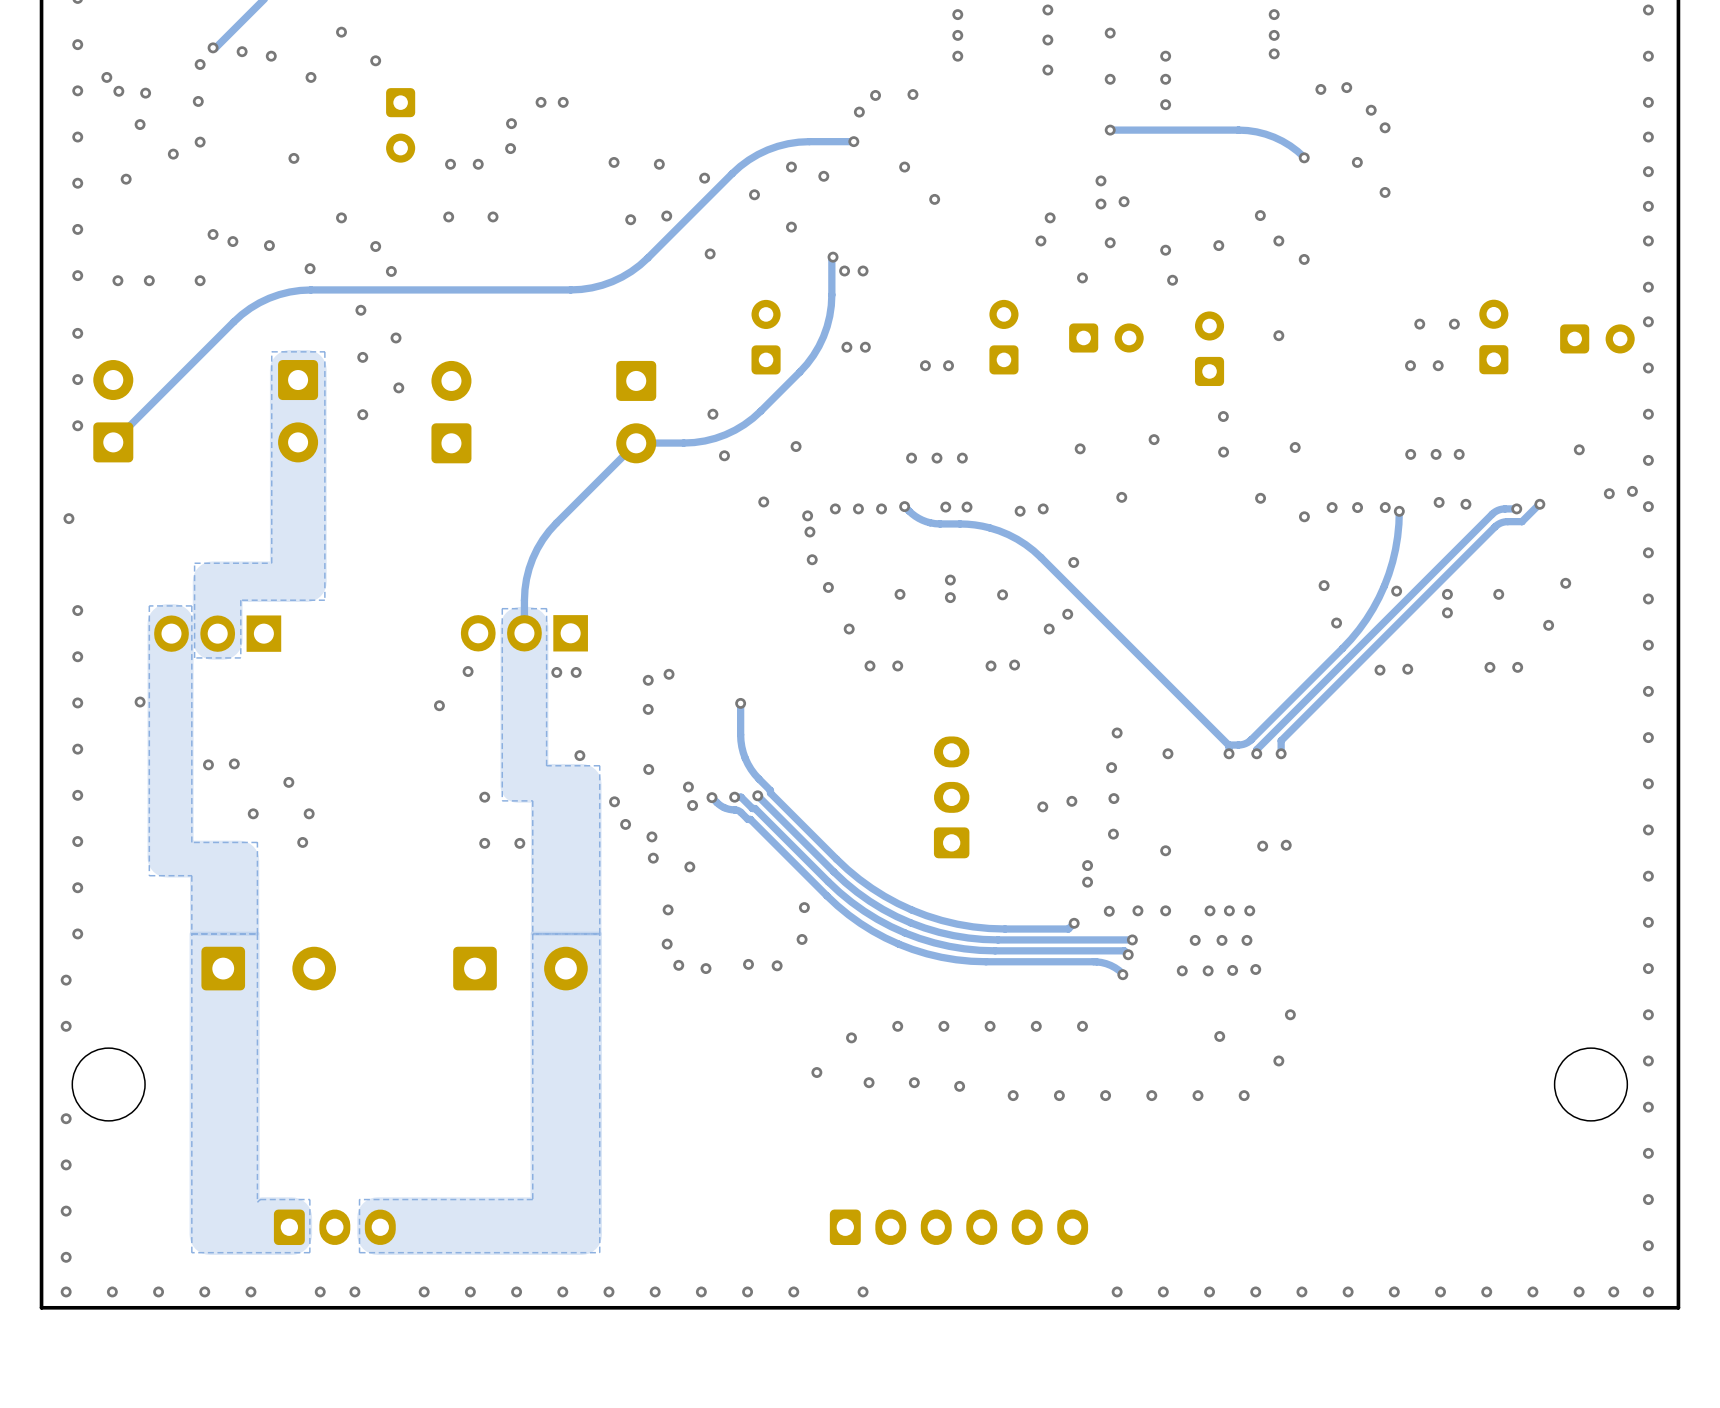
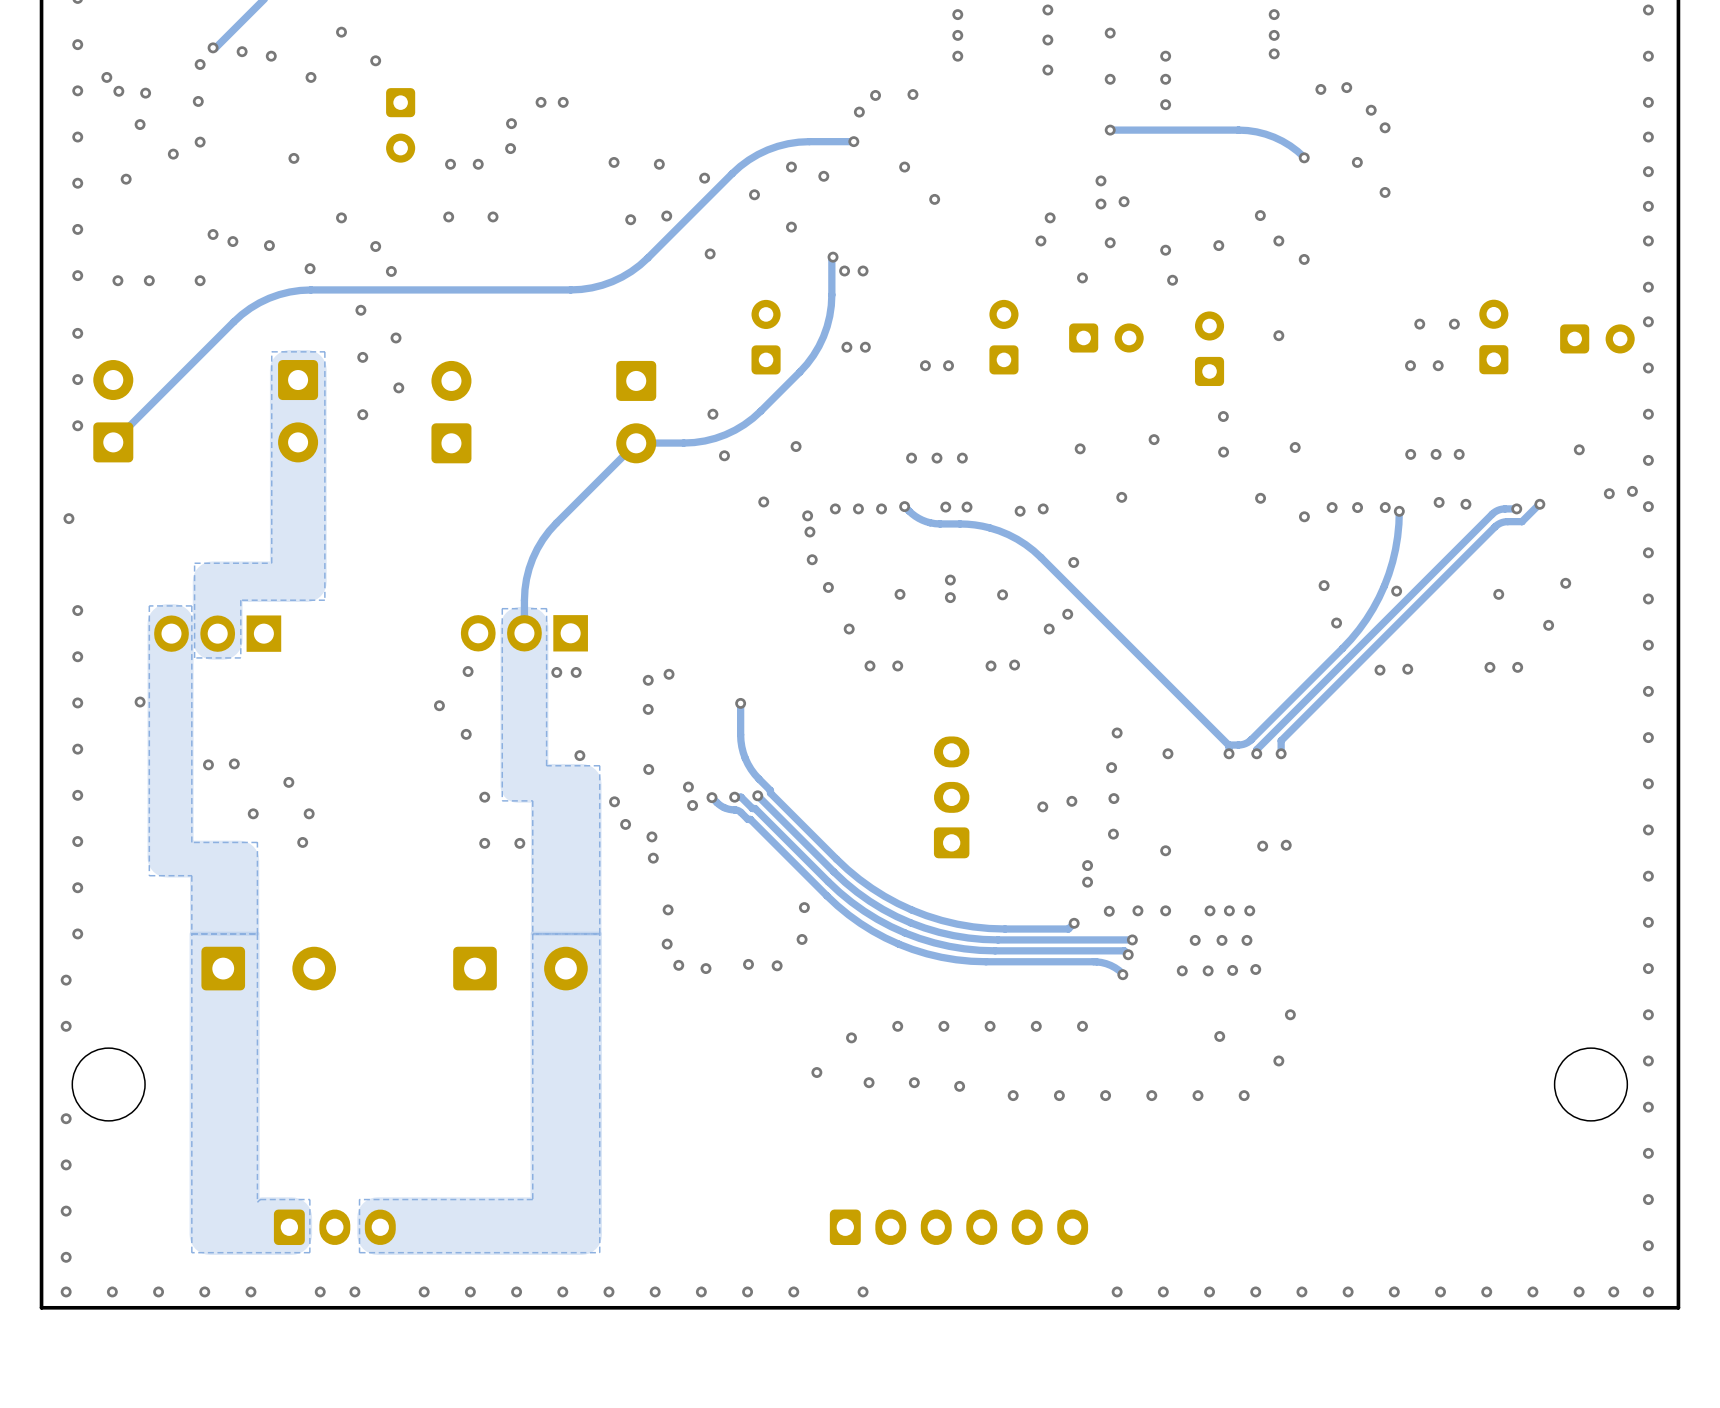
via: (1447, 594) -> none
via: (1447, 612) -> none
via: none -> (466, 734)
via: (689, 866) -> none

